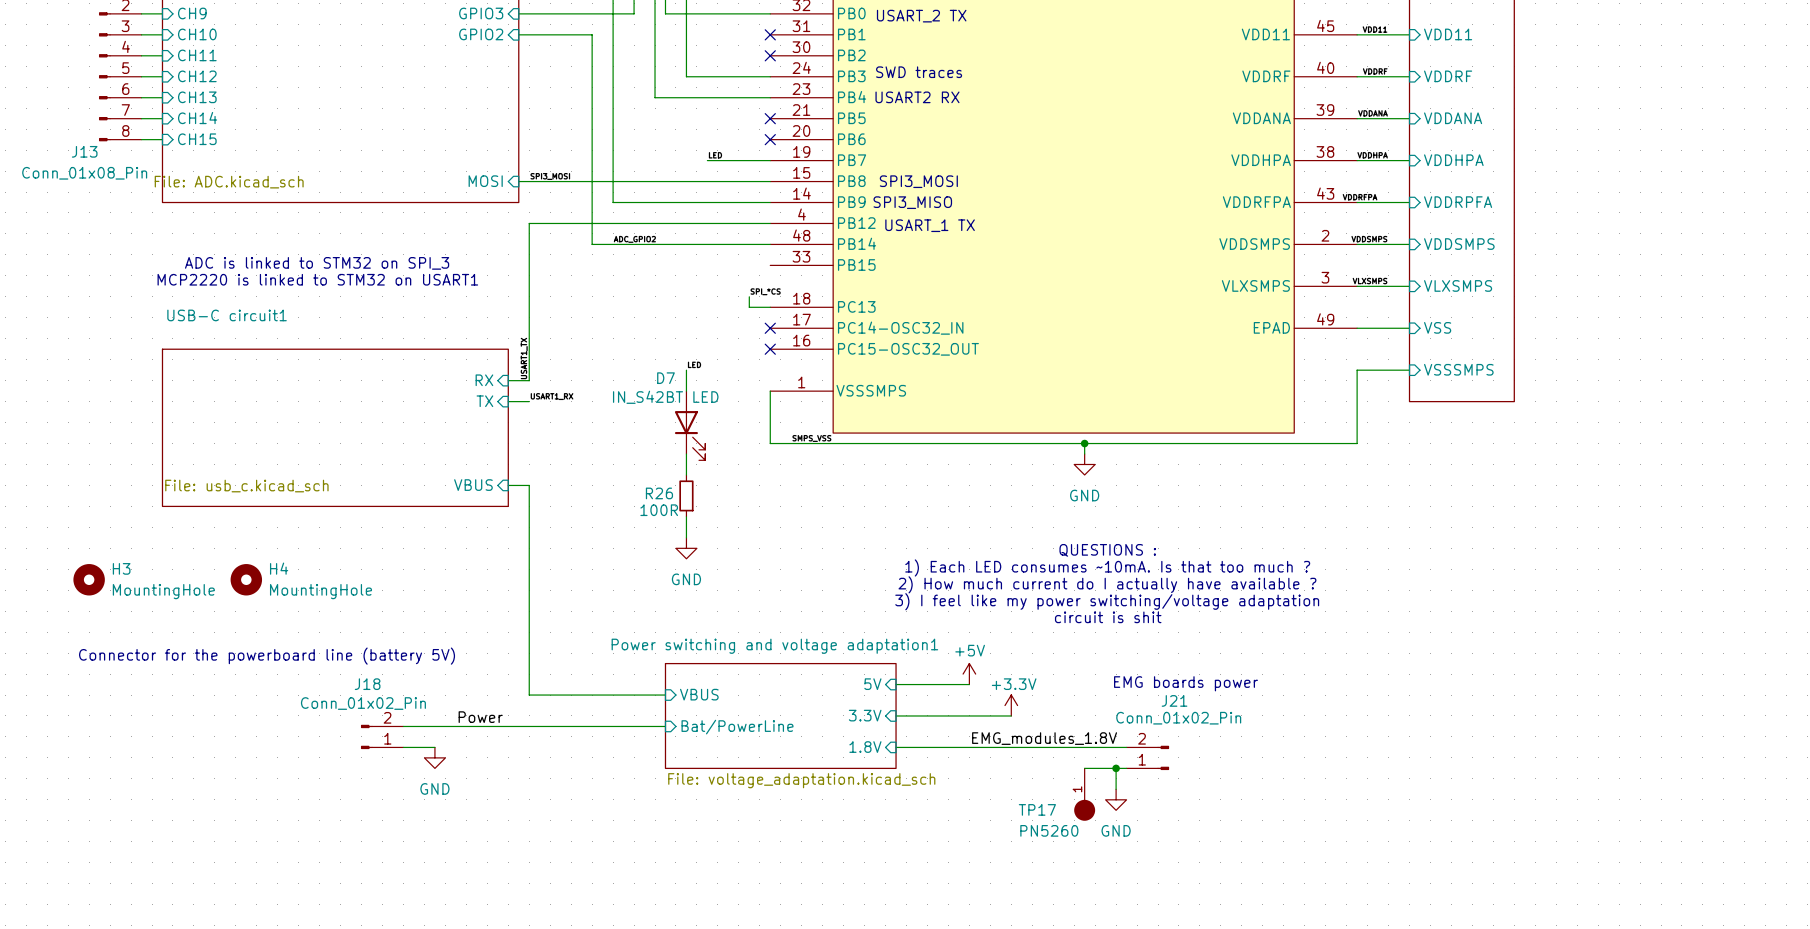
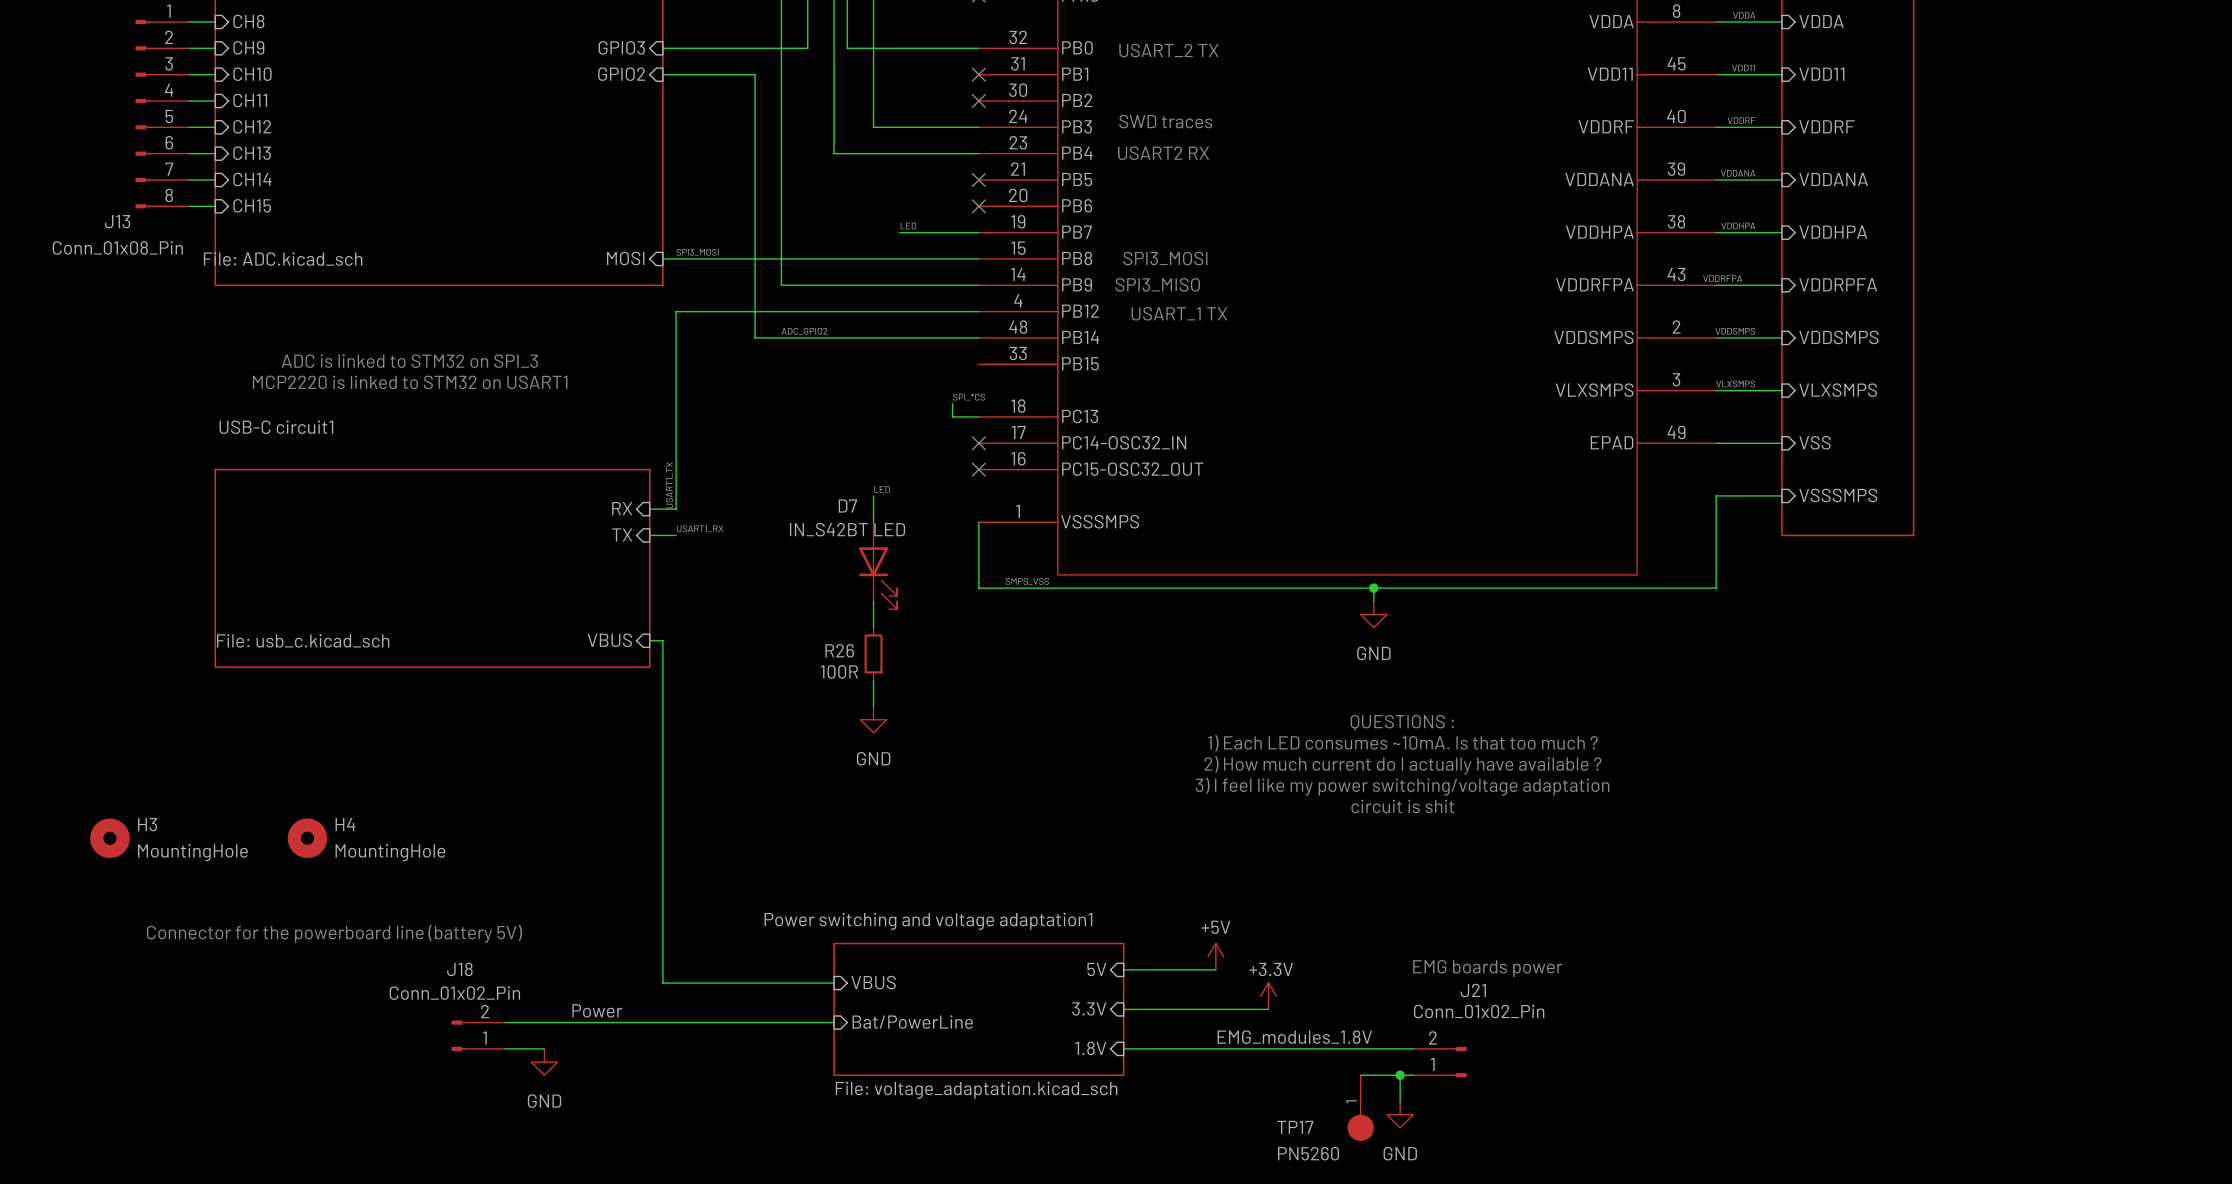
wire: (518, 485) (529, 485) (529, 695) (665, 695) -> (662, 640) (662, 983) (834, 983)
H3 position: (89, 579) -> (109, 838)
H4 position: (246, 579) -> (307, 838)
text position: Connector for the powerboard line (battery 5V) (267, 656) -> Connector for the powerboard line (battery 5V) (334, 933)
power symbol position: +5V (969, 674) -> +5V (1215, 956)
text position: EMG boards power (1186, 683) -> EMG boards power (1487, 968)
sheet pin position: 5V (872, 684) -> 5V (1096, 969)
wire: (896, 684) (969, 684) -> none
sheet pin position: VBUS (699, 694) -> VBUS (873, 982)
power symbol position: +3.3V (1011, 705) -> +3.3V (1268, 996)
sheet Power switching and voltage adaptation1 position: (780, 715) -> (978, 1009)
sheet pin position: 3.3V (865, 715) -> 3.3V (1089, 1008)
wire: (896, 715) (1011, 715) -> (1123, 1009) (1268, 1009)
label position: Power (480, 717) -> Power (597, 1010)
wire: (403, 726) (665, 726) -> (504, 1022) (834, 1022)
sheet pin position: Bat/PowerLine (737, 727) -> Bat/PowerLine (912, 1022)
J18 position: (382, 736) -> (478, 1035)
label position: EMG_modules_1.8V (1044, 738) -> EMG_modules_1.8V (1294, 1037)
wire: (403, 747) (434, 747) -> (504, 1048) (544, 1048)
sheet pin position: 1.8V (865, 747) -> 1.8V (1090, 1048)
wire: none -> (1123, 969) (1136, 969)
wire: (958, 747) (1126, 747) -> none
power symbol position: GND (434, 757) -> GND (544, 1062)
J21 position: (1147, 757) -> (1440, 1062)
wire: (1084, 768) (1126, 768) -> (1360, 1075) (1413, 1075)
wire: (1116, 768) (1116, 789) -> (1400, 1075) (1400, 1101)
junction: (1116, 768) -> none
TP17 position: (1084, 794) -> (1360, 1108)
power symbol position: GND (1116, 799) -> GND (1400, 1114)
wire: none -> (1123, 1048) (1413, 1048)
junction: none -> (1400, 1075)

